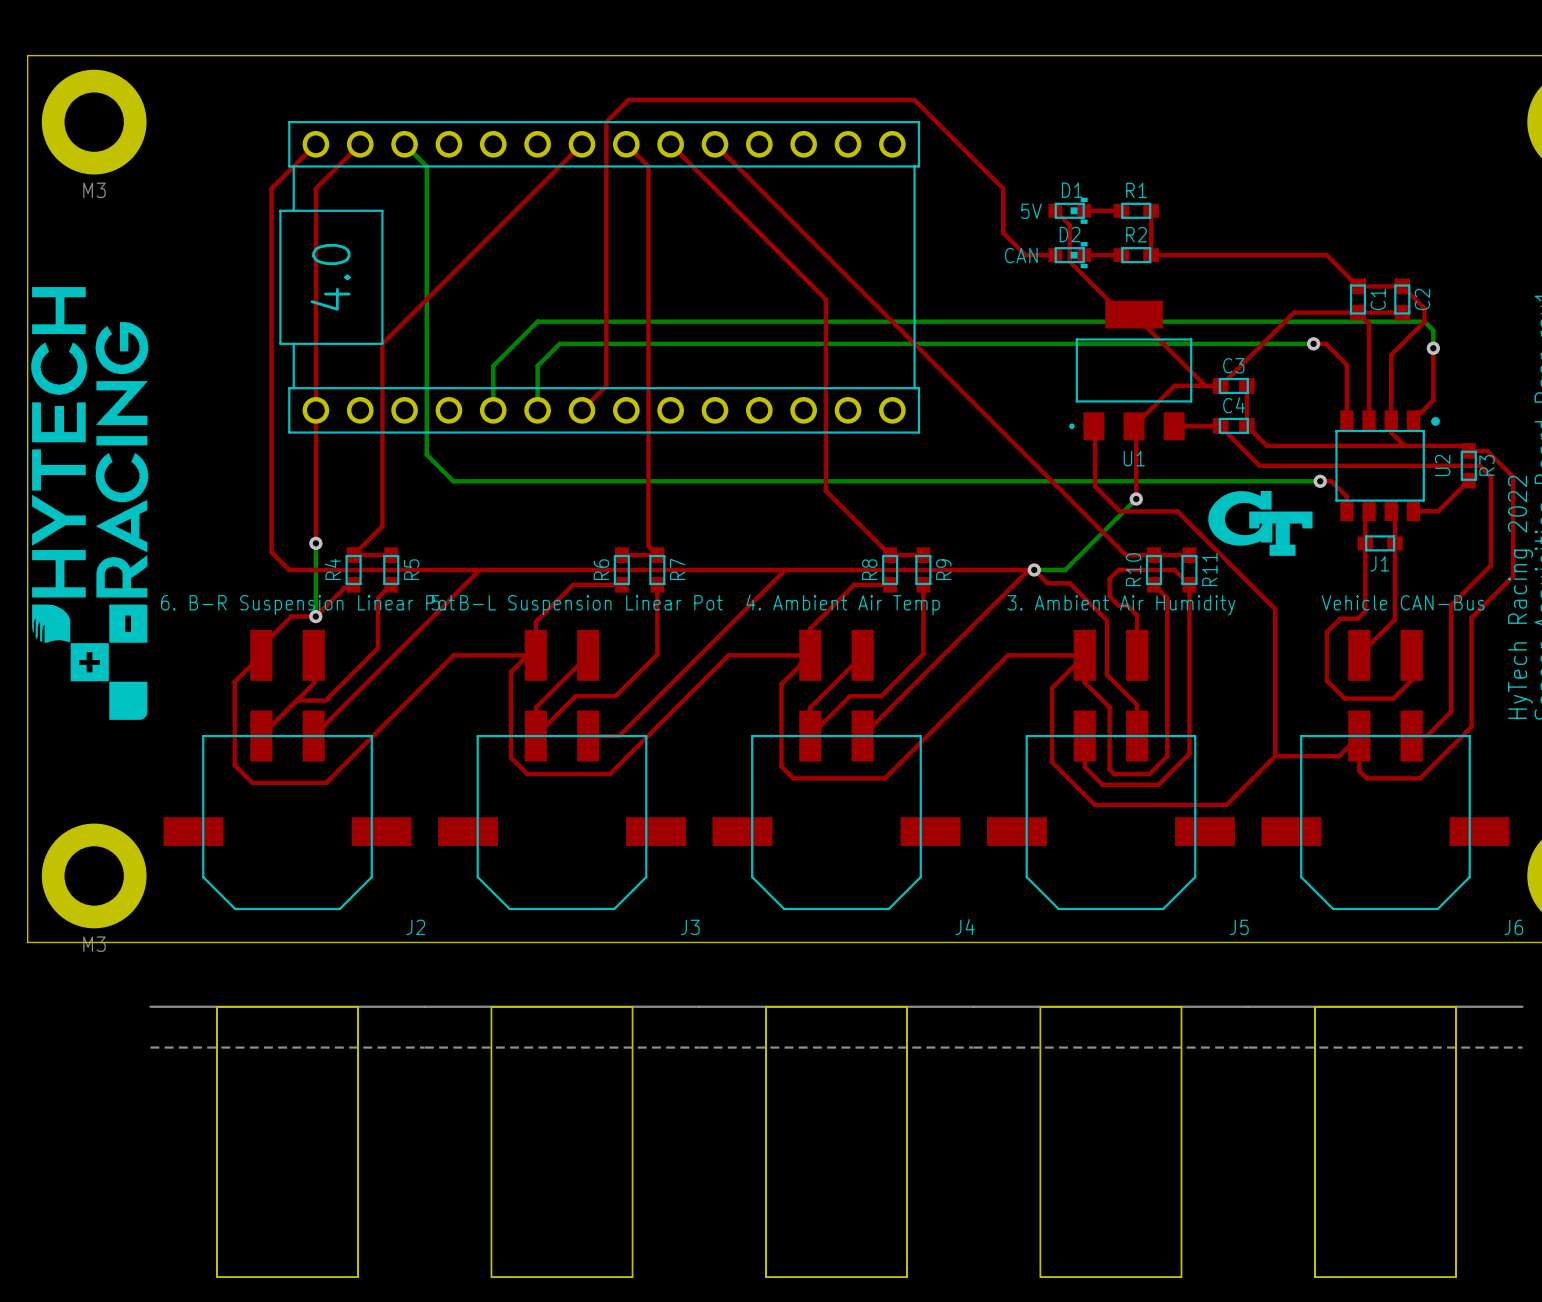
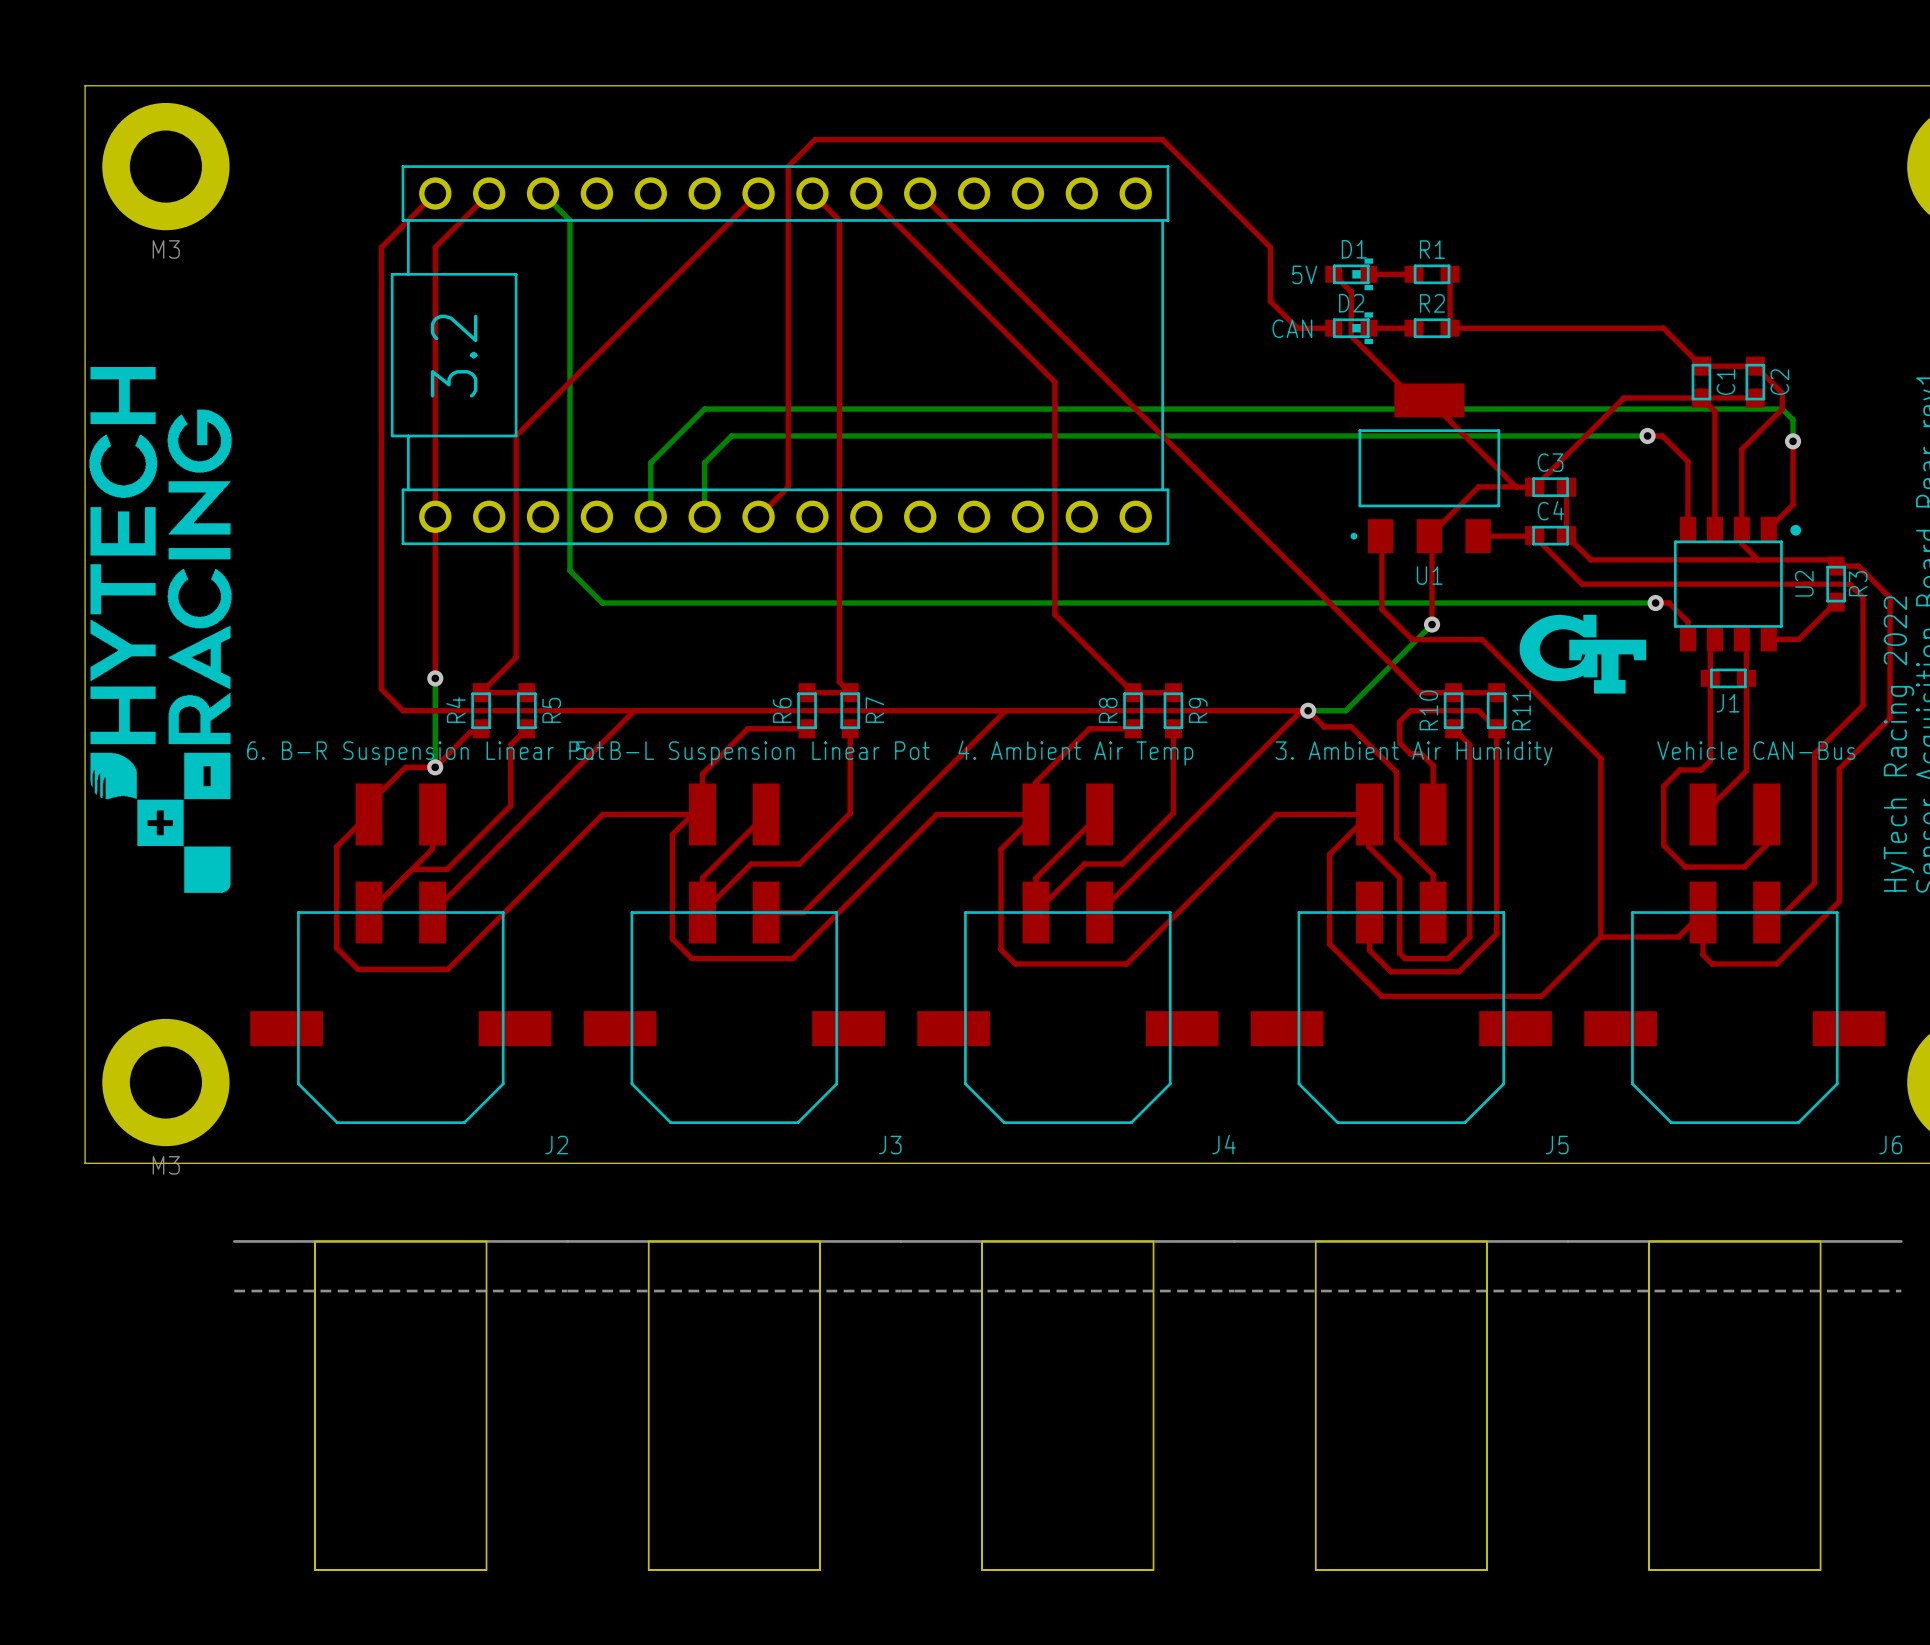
text: 4.0 (330, 277) -> 3.2 (454, 356)

